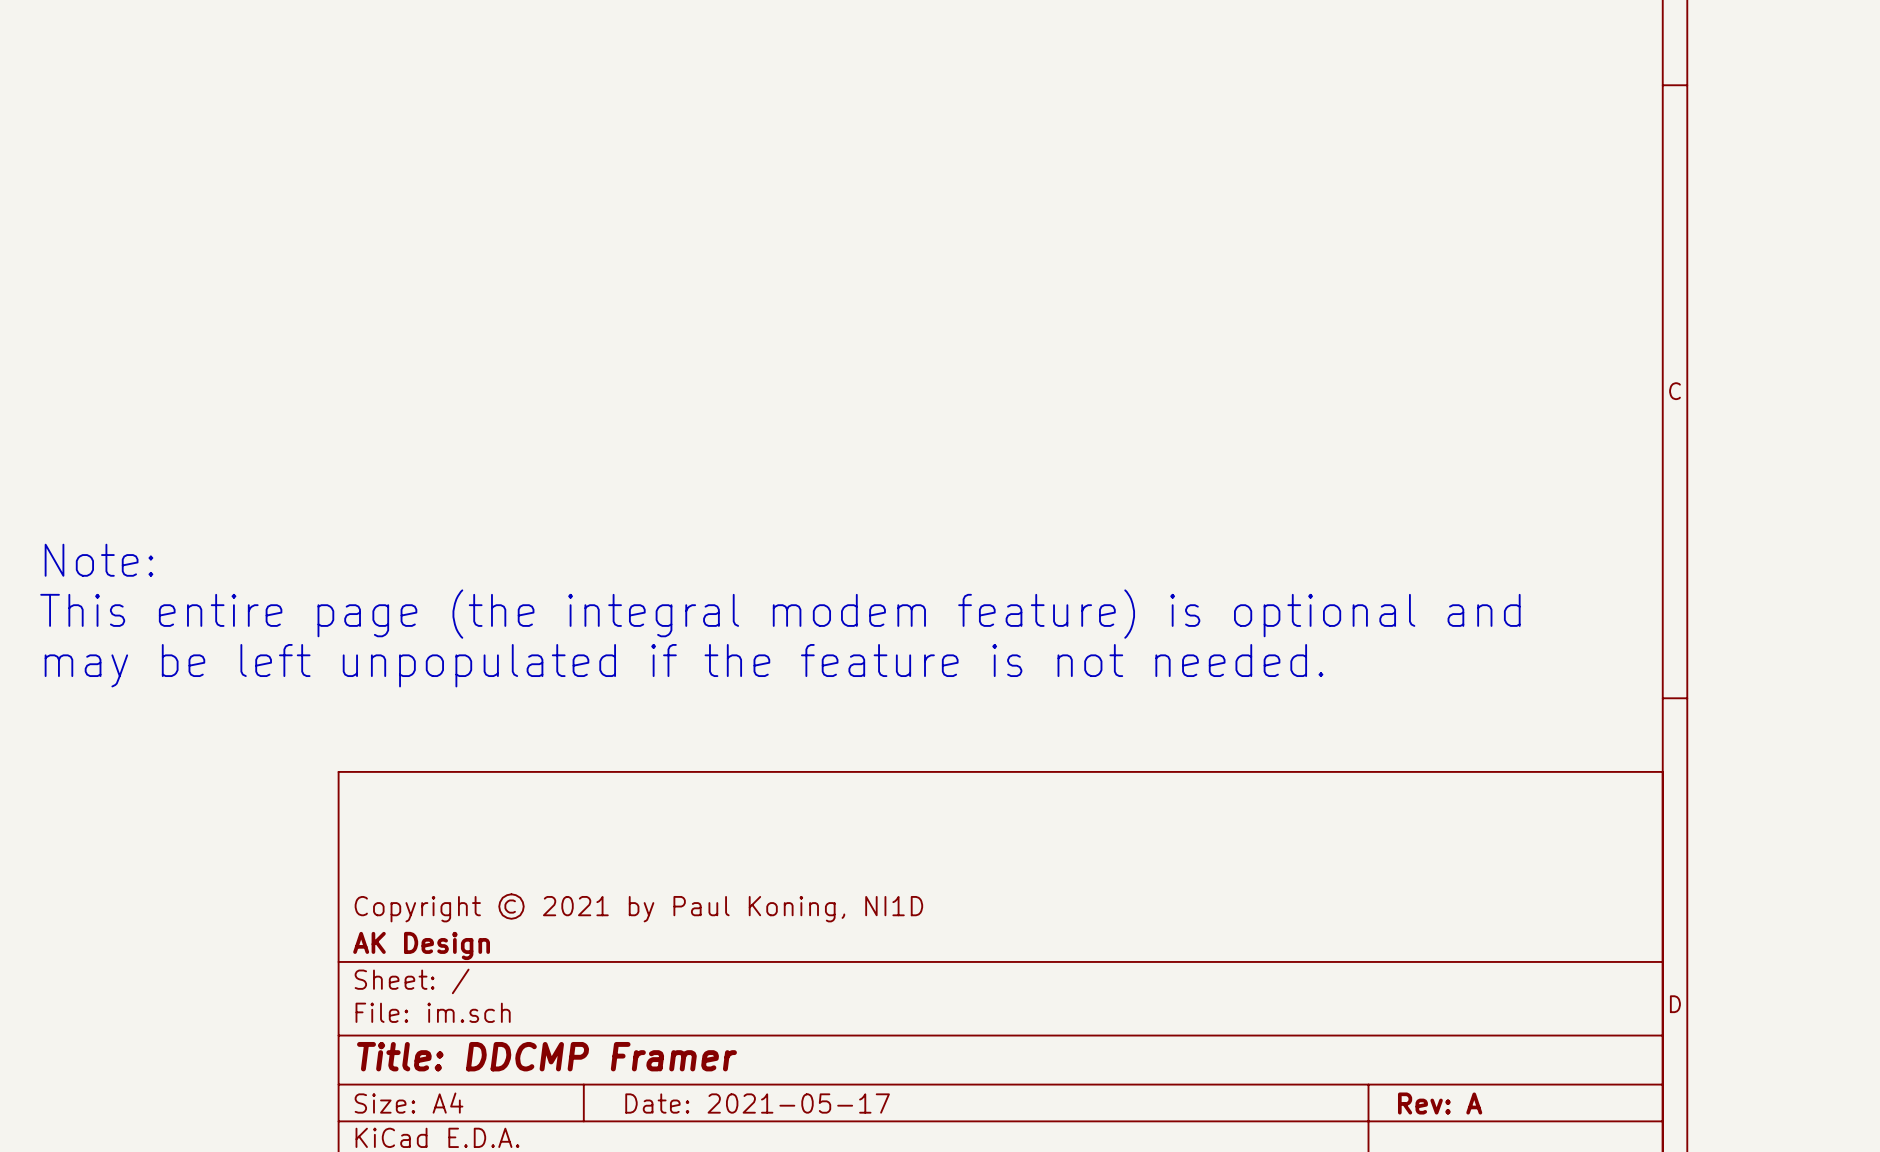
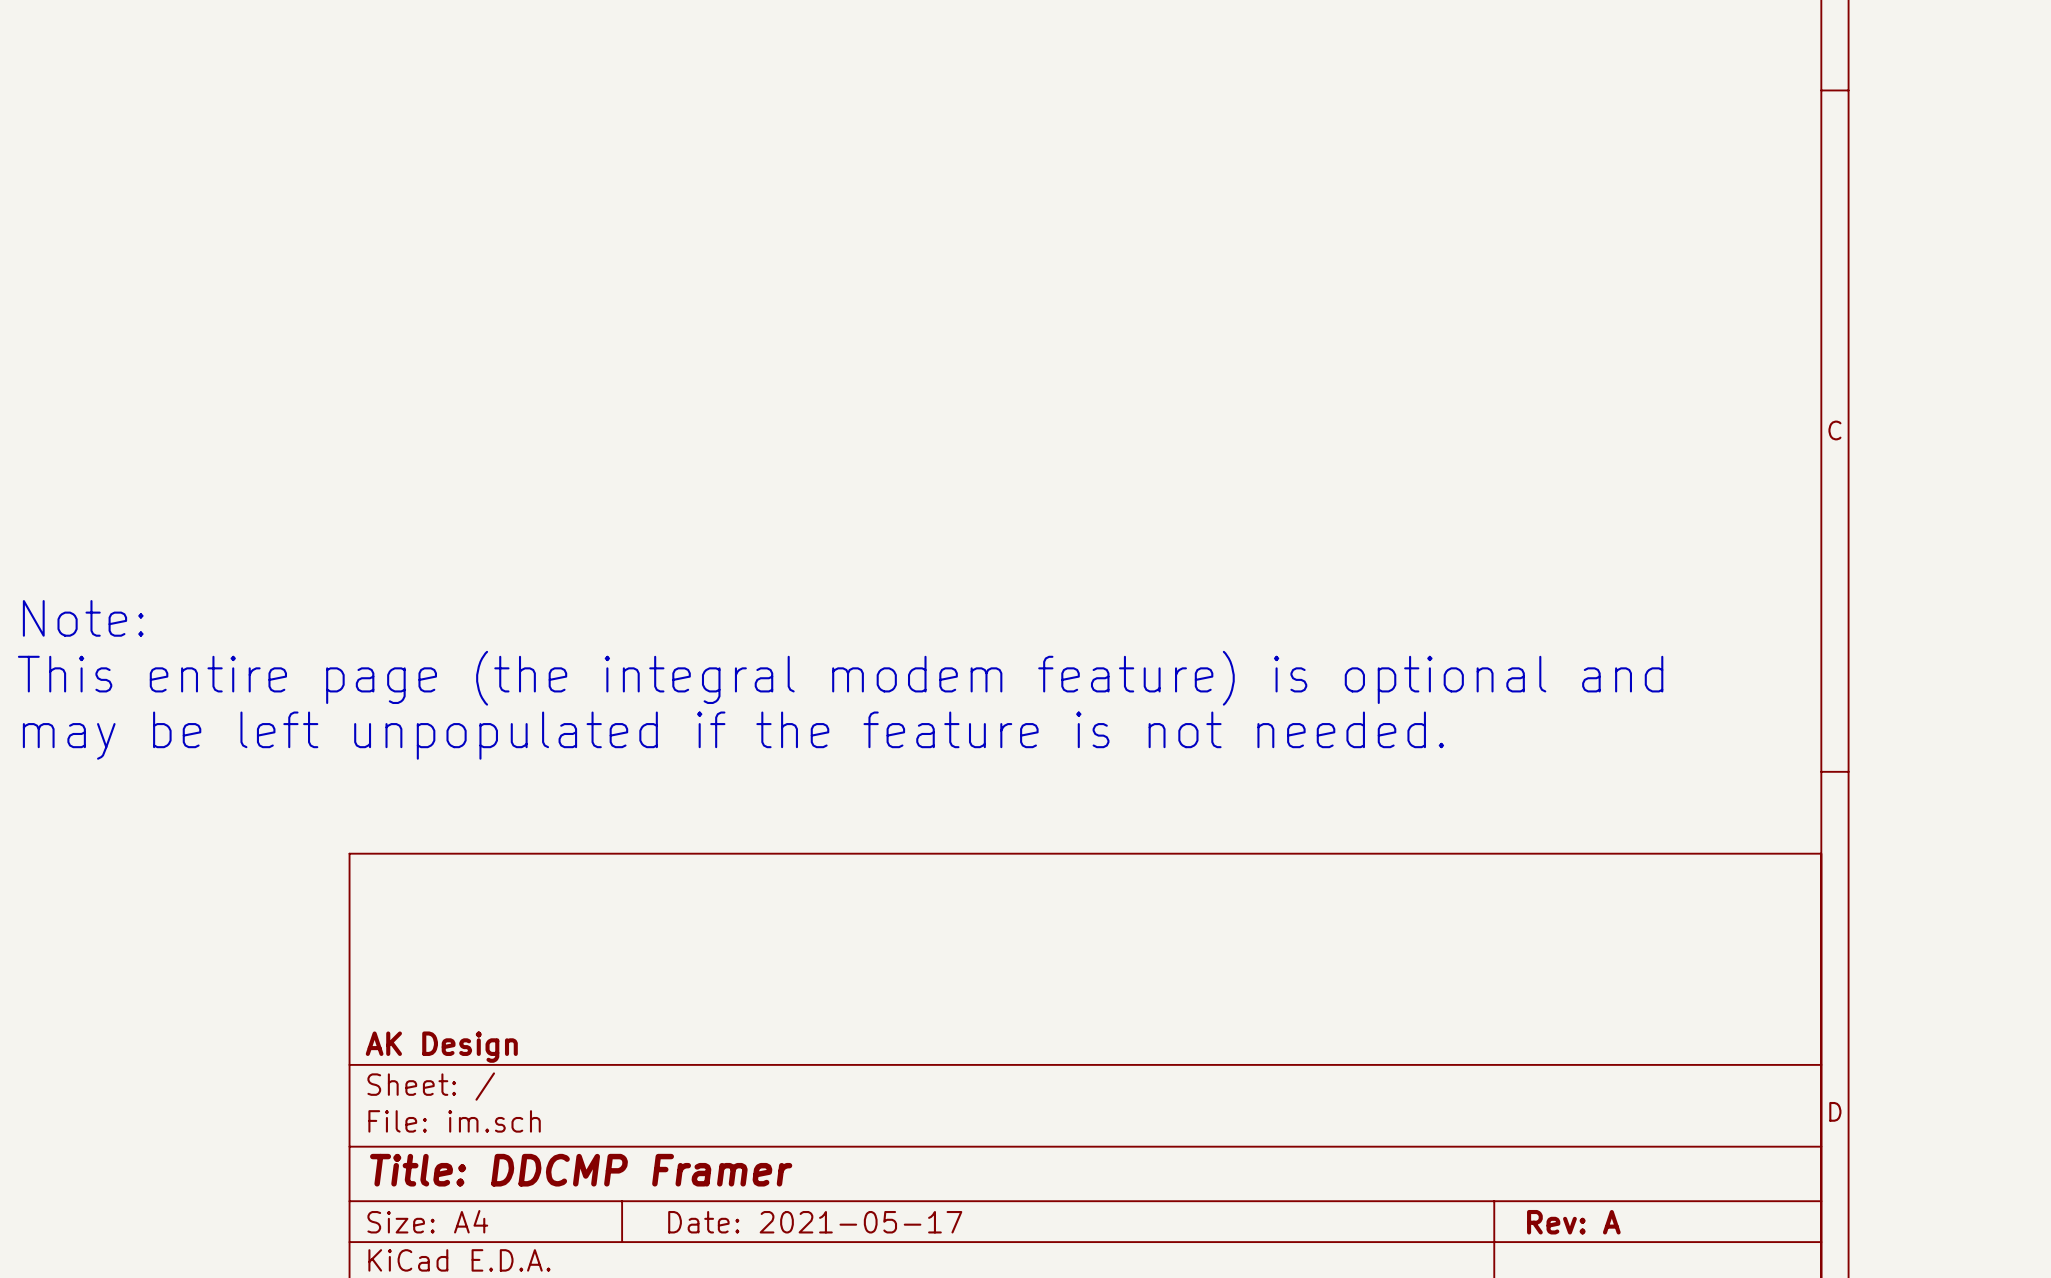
title block: Copyright © 2021 by Paul Koning, NI1D (638, 907) -> none

